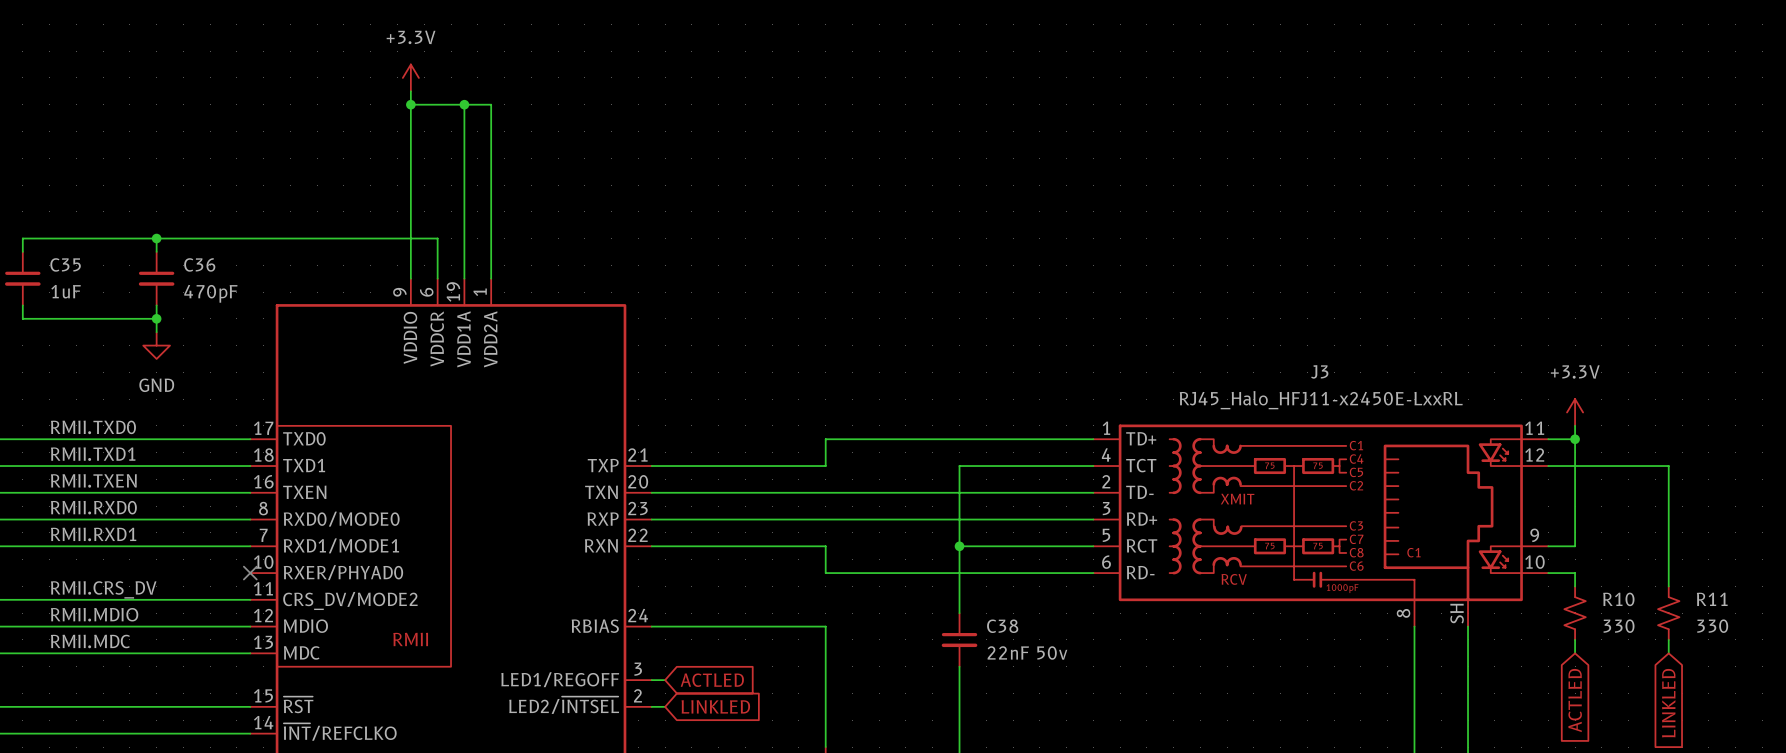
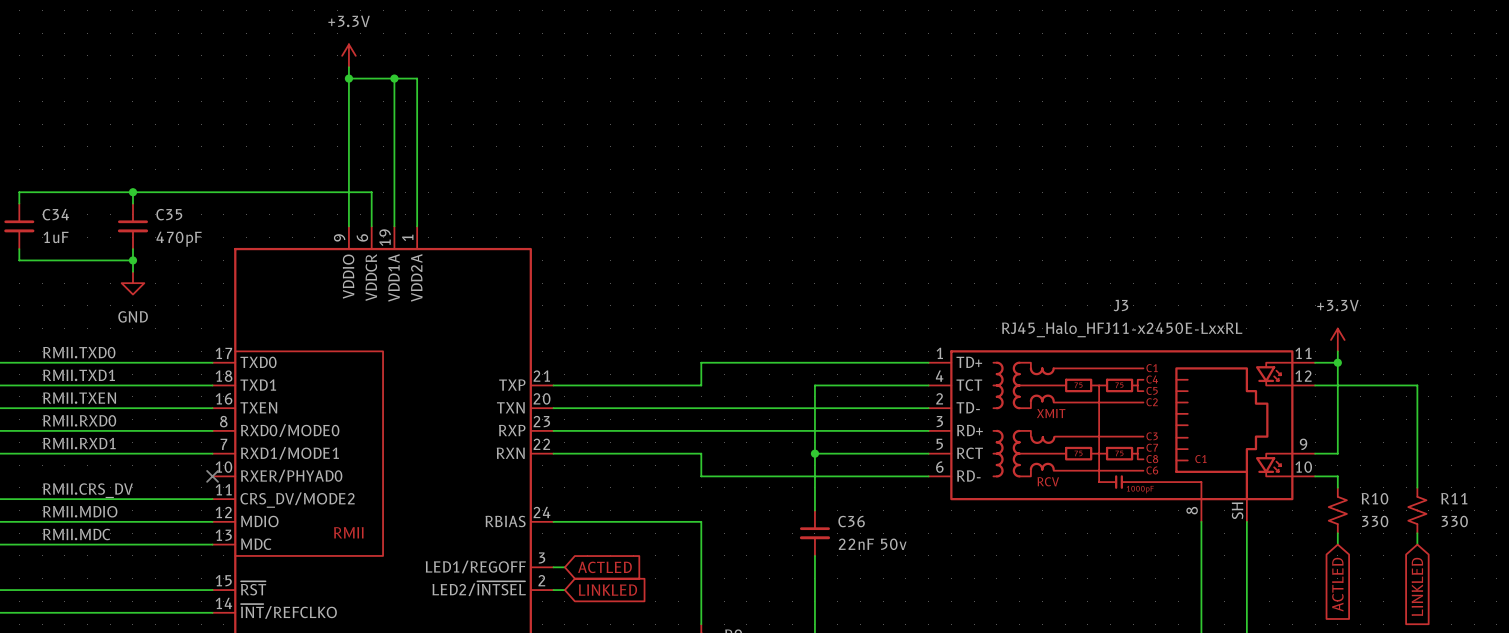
C35 name: C35 (65, 264) -> C34 (55, 214)
C36 name: C36 (199, 264) -> C35 (169, 214)
C38 name: C38 (1002, 626) -> C36 (851, 521)

